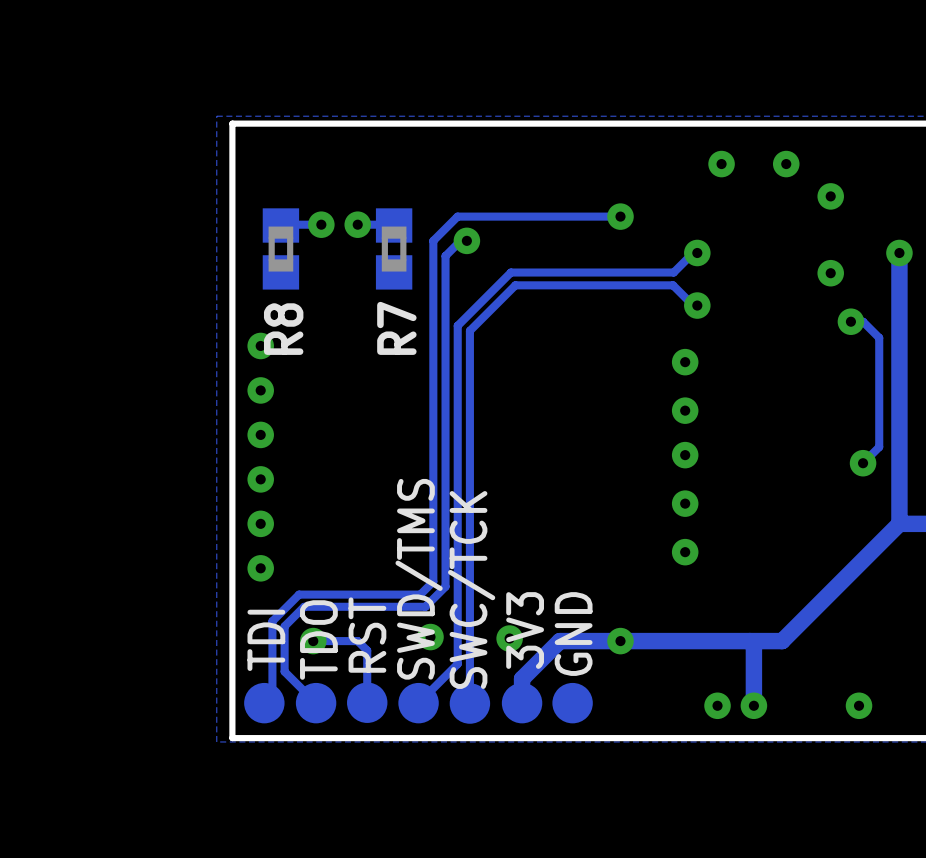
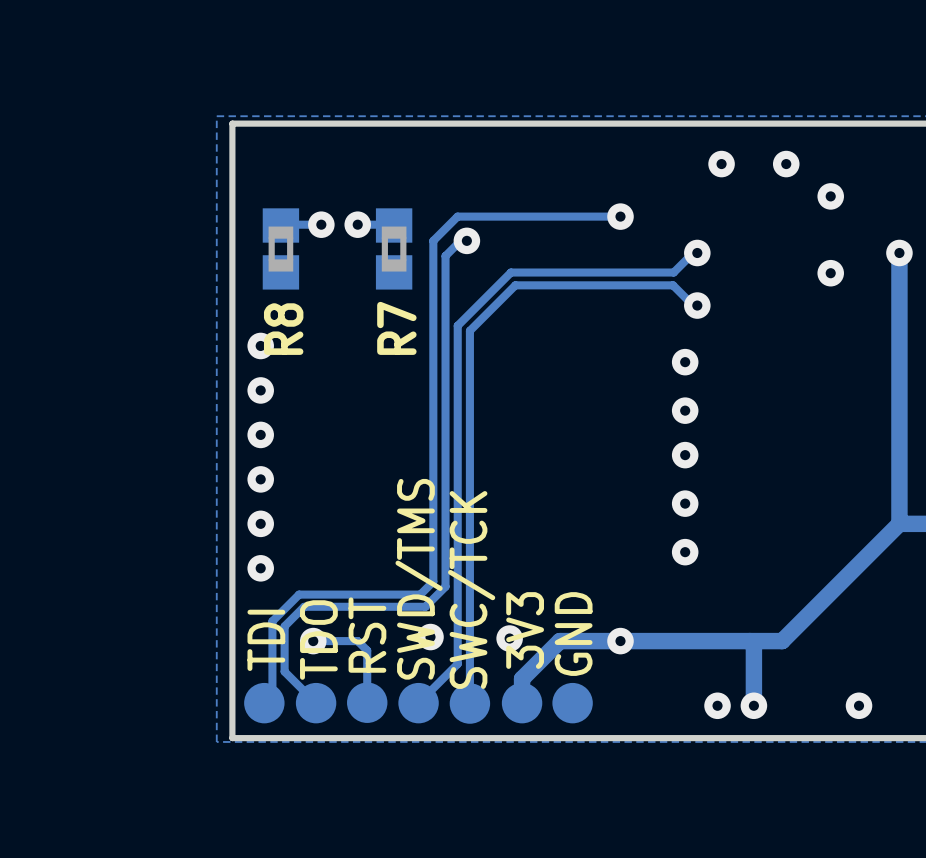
track: (850, 321) (863, 321) (879, 337) (879, 447) (863, 463) -> none
via: (850, 321) -> none
via: (863, 463) -> none

